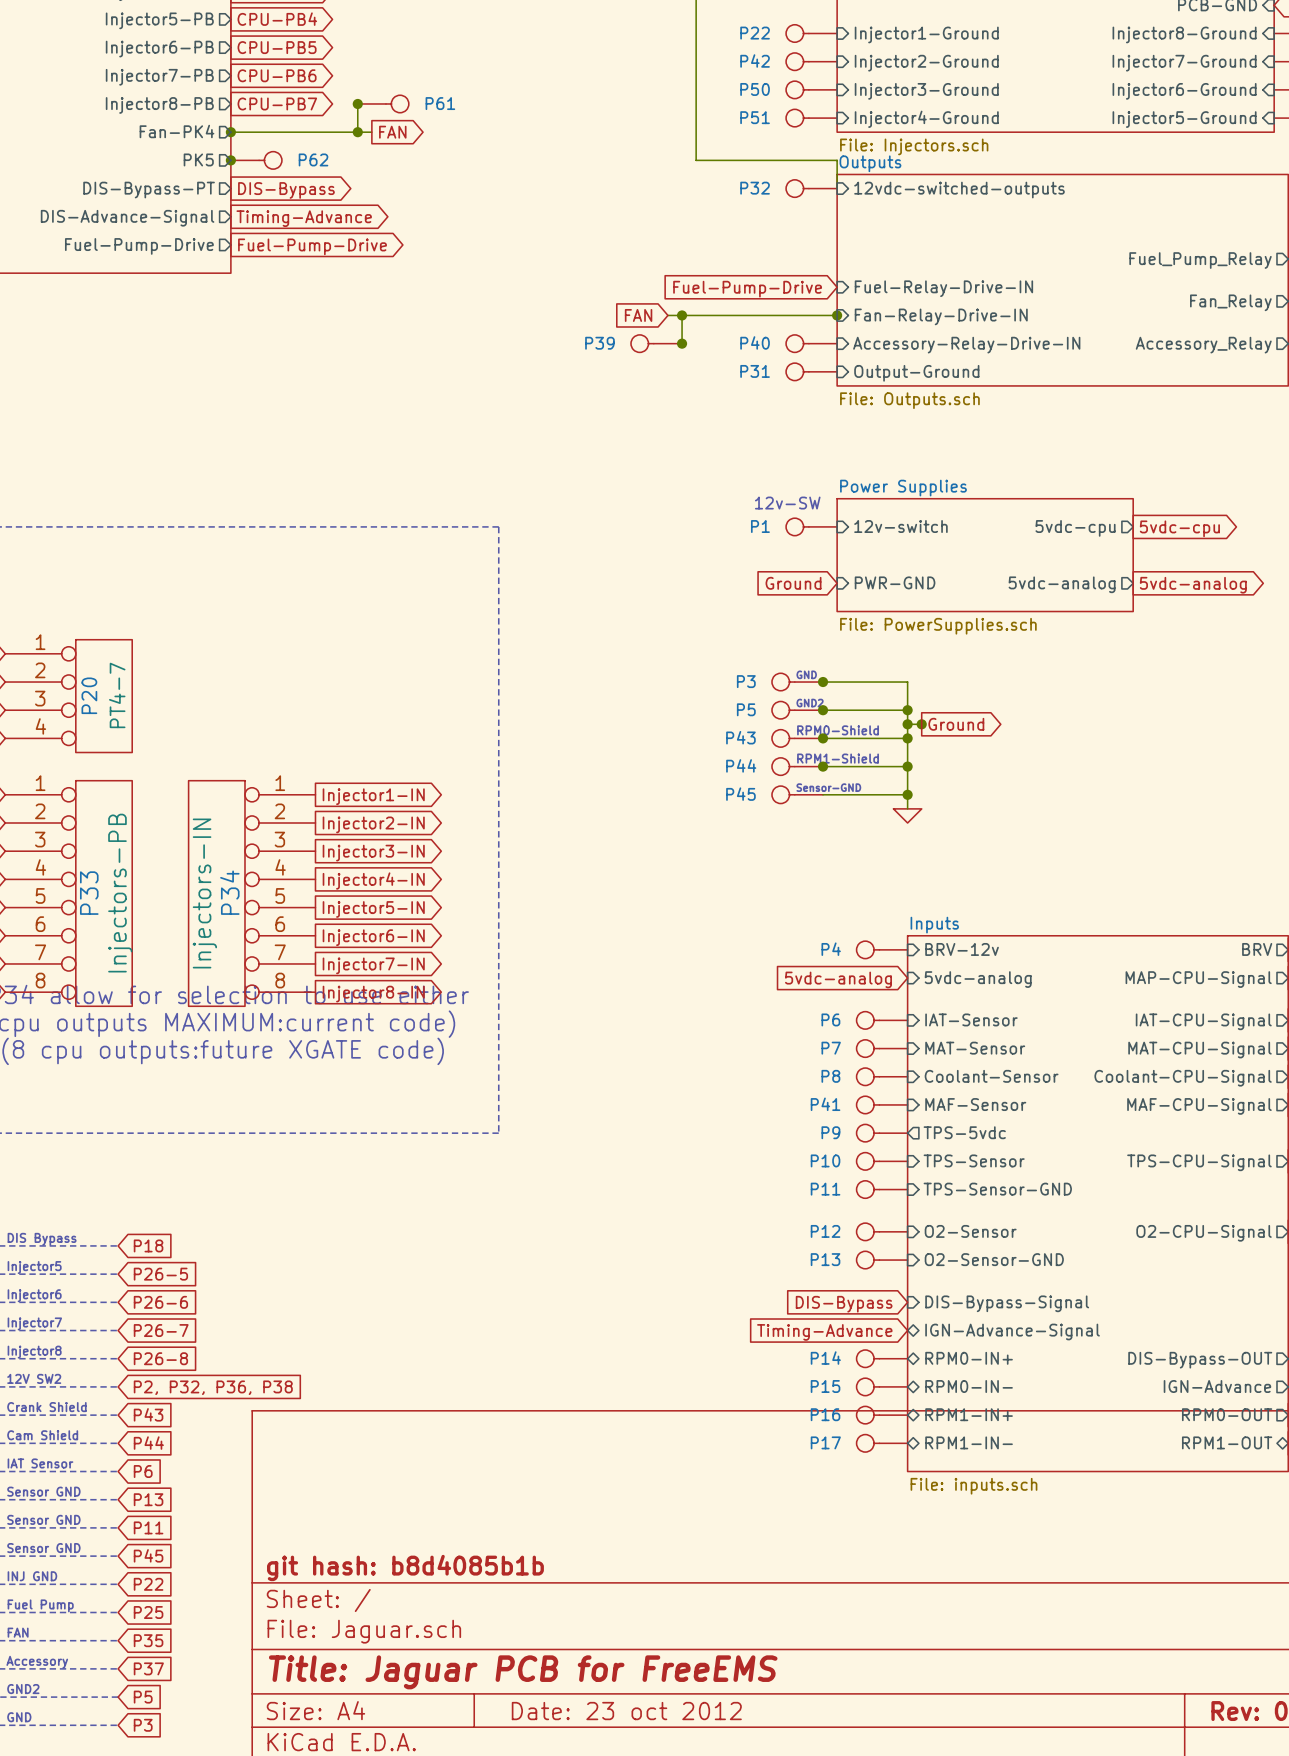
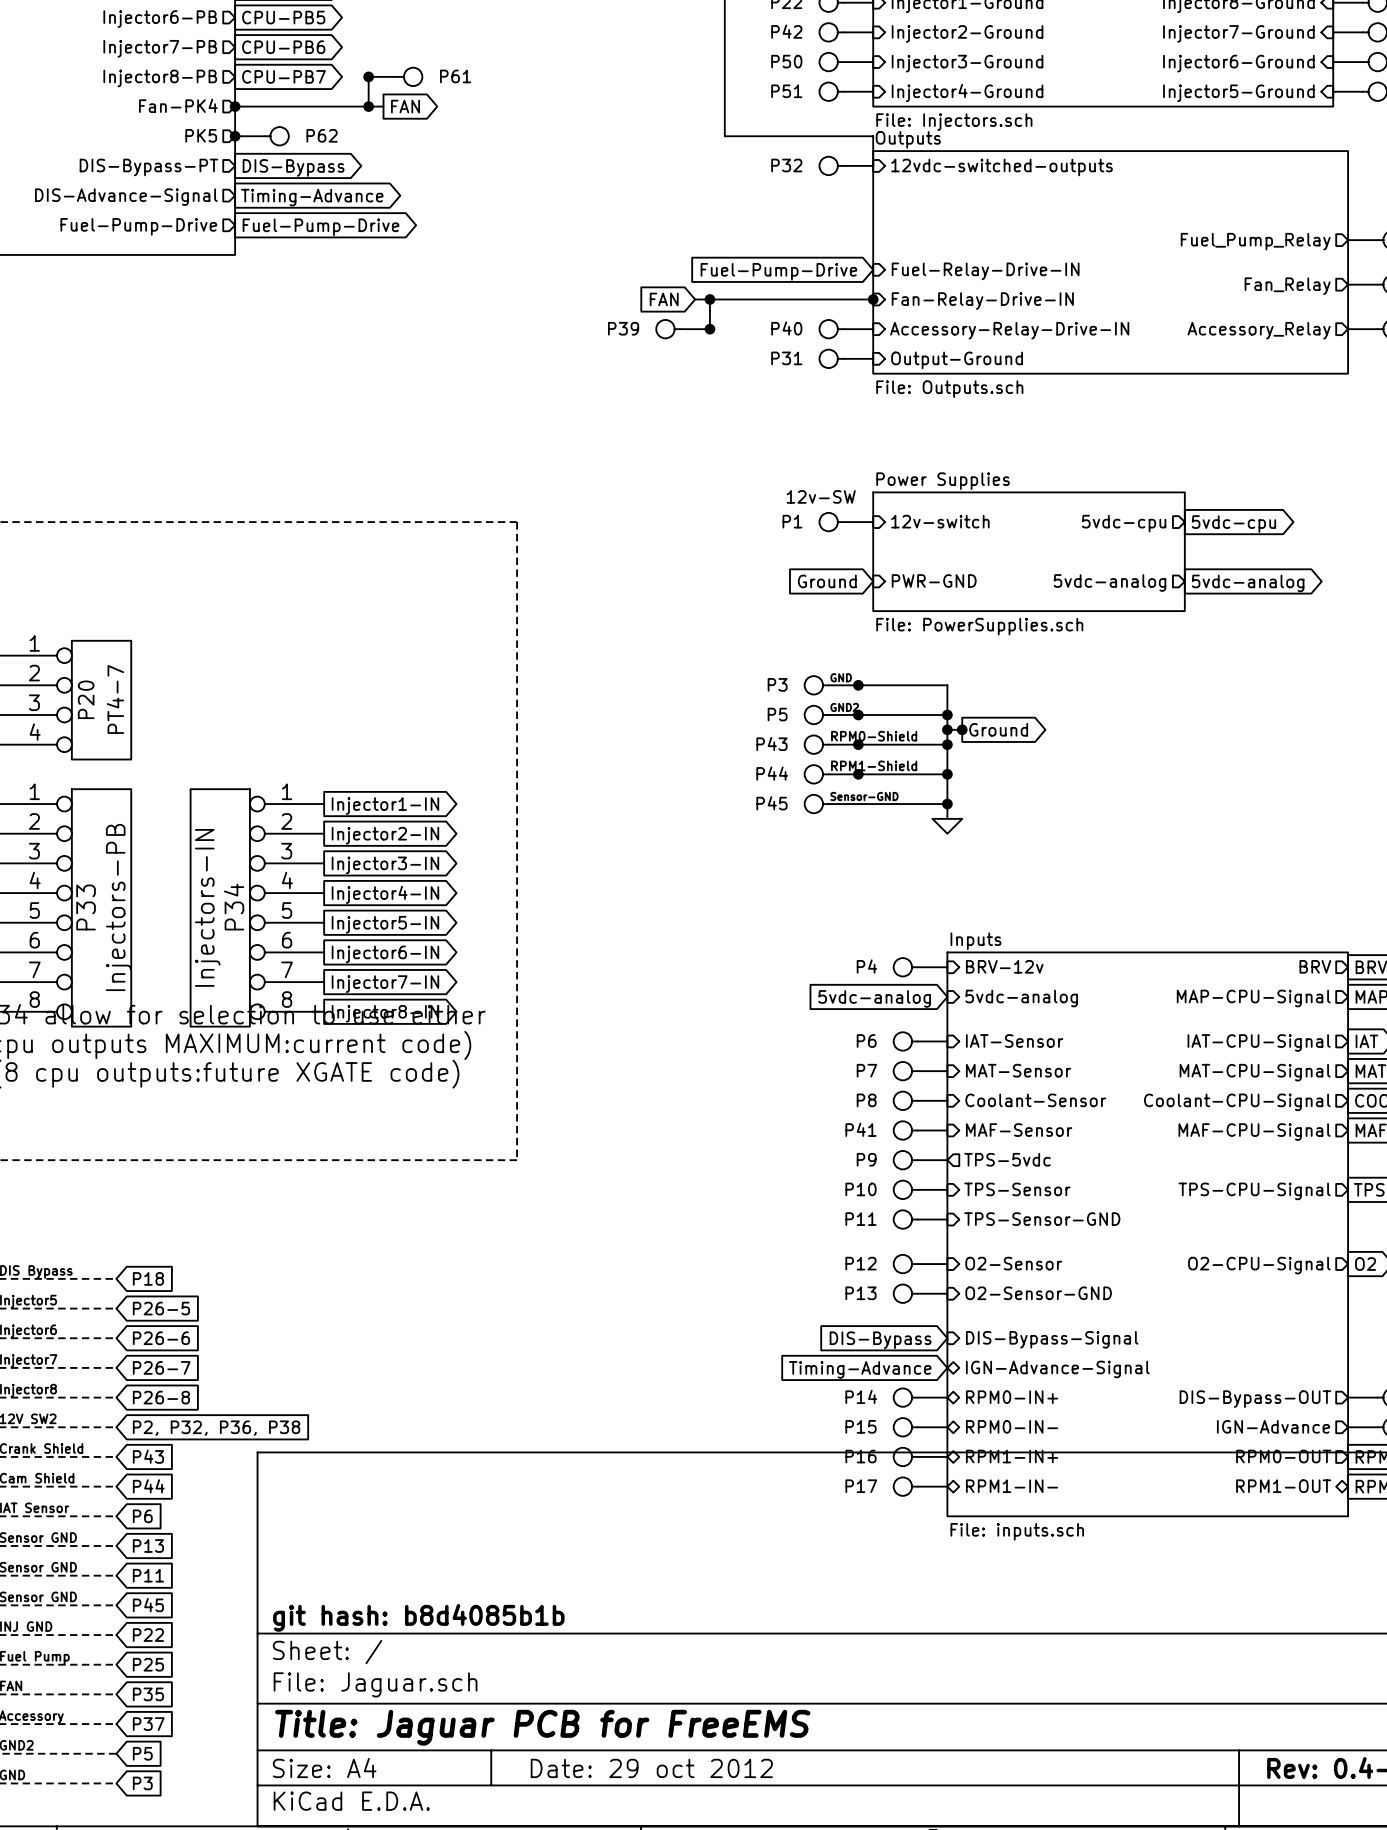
title block: Date: 23 oct 2012 (626, 1711) -> Date: 29 oct 2012 (651, 1768)

